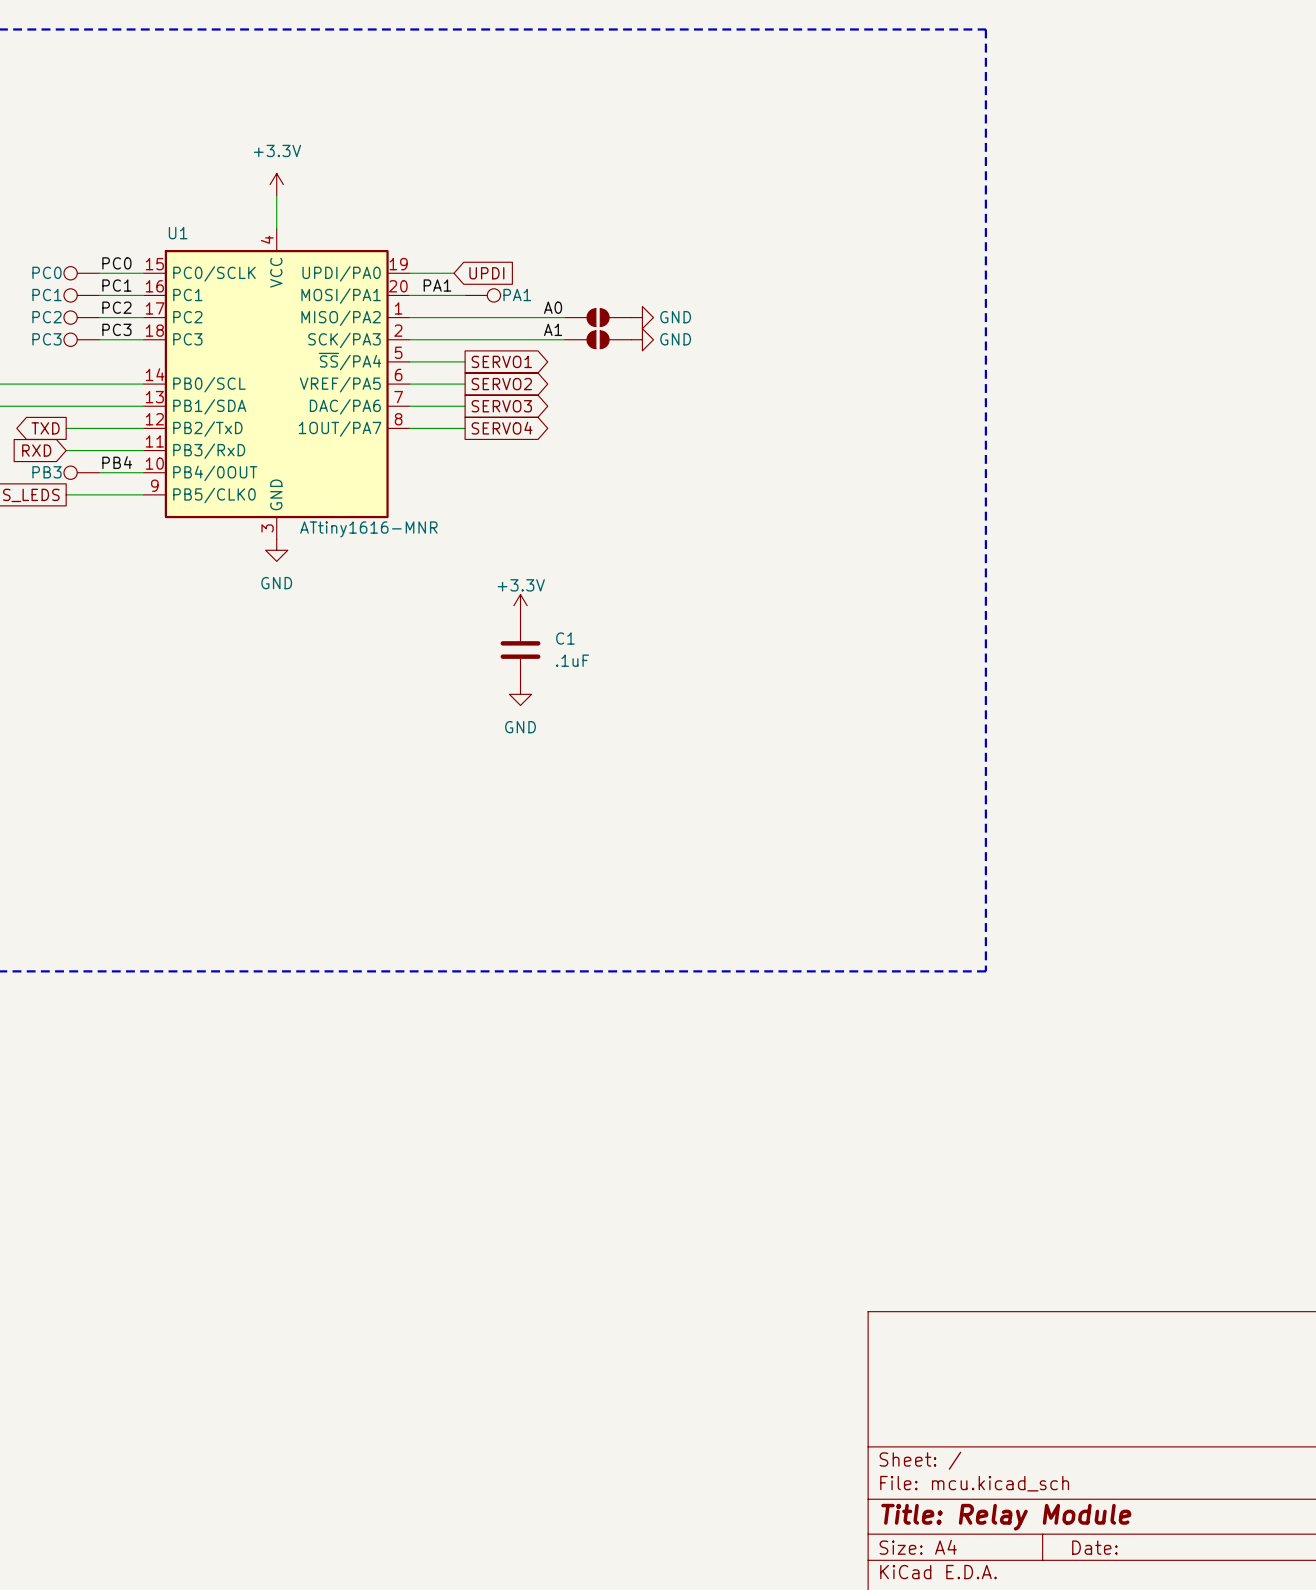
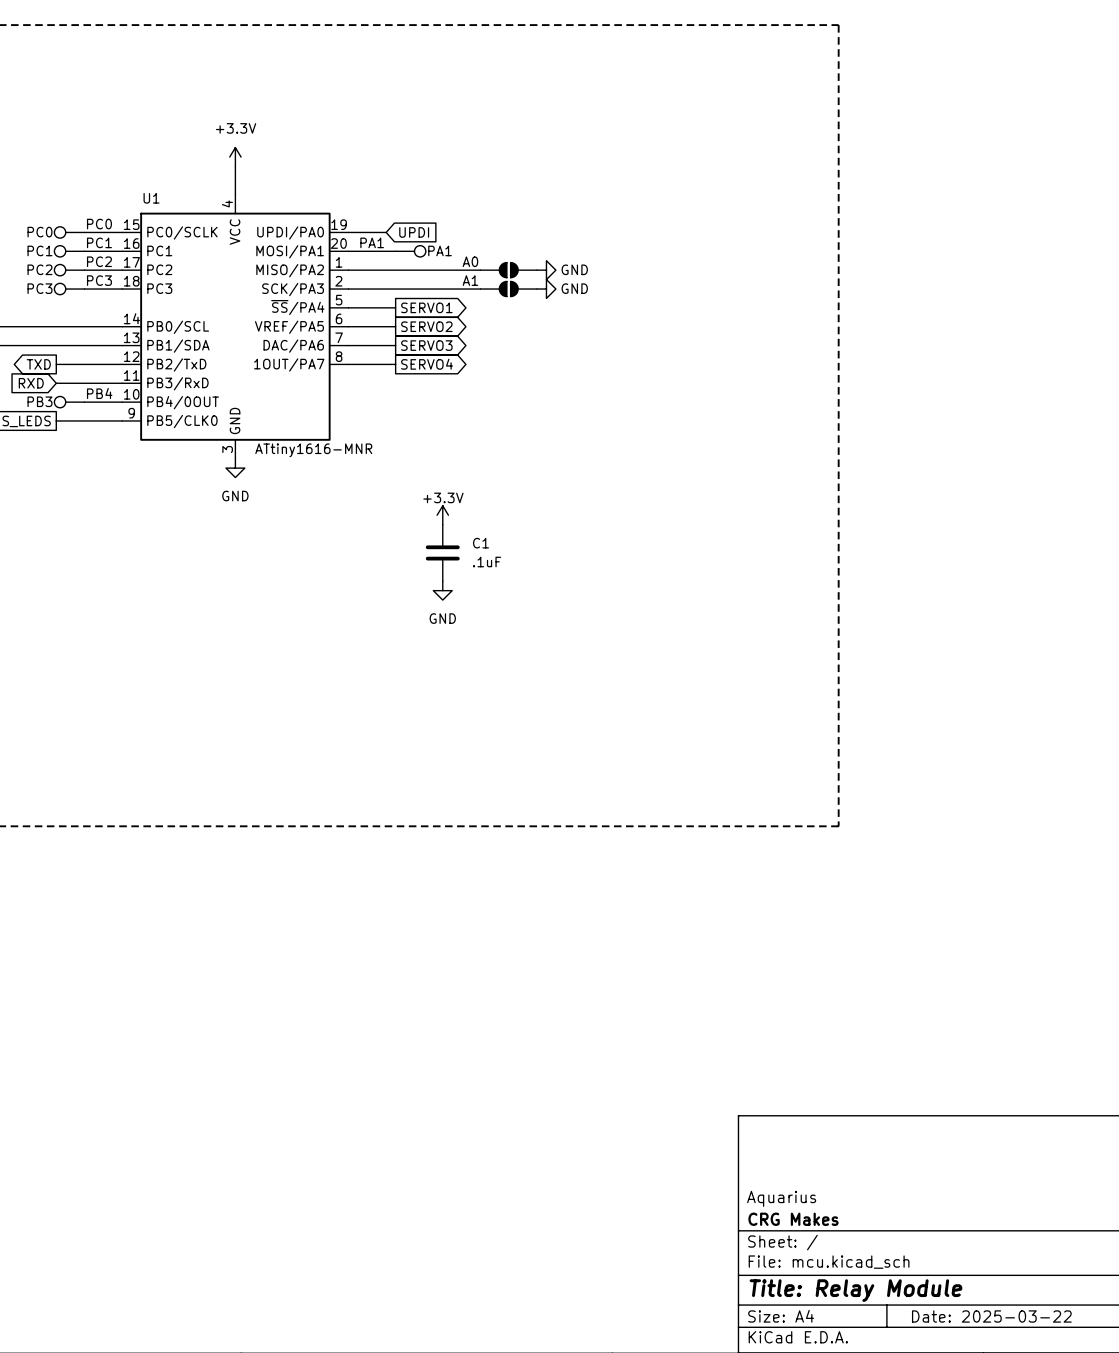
title block: none -> Aquarius (781, 1198)
title block: none -> CRG Makes (793, 1219)
title block: Date: (1094, 1547) -> Date: 2025-03-22 (991, 1316)

